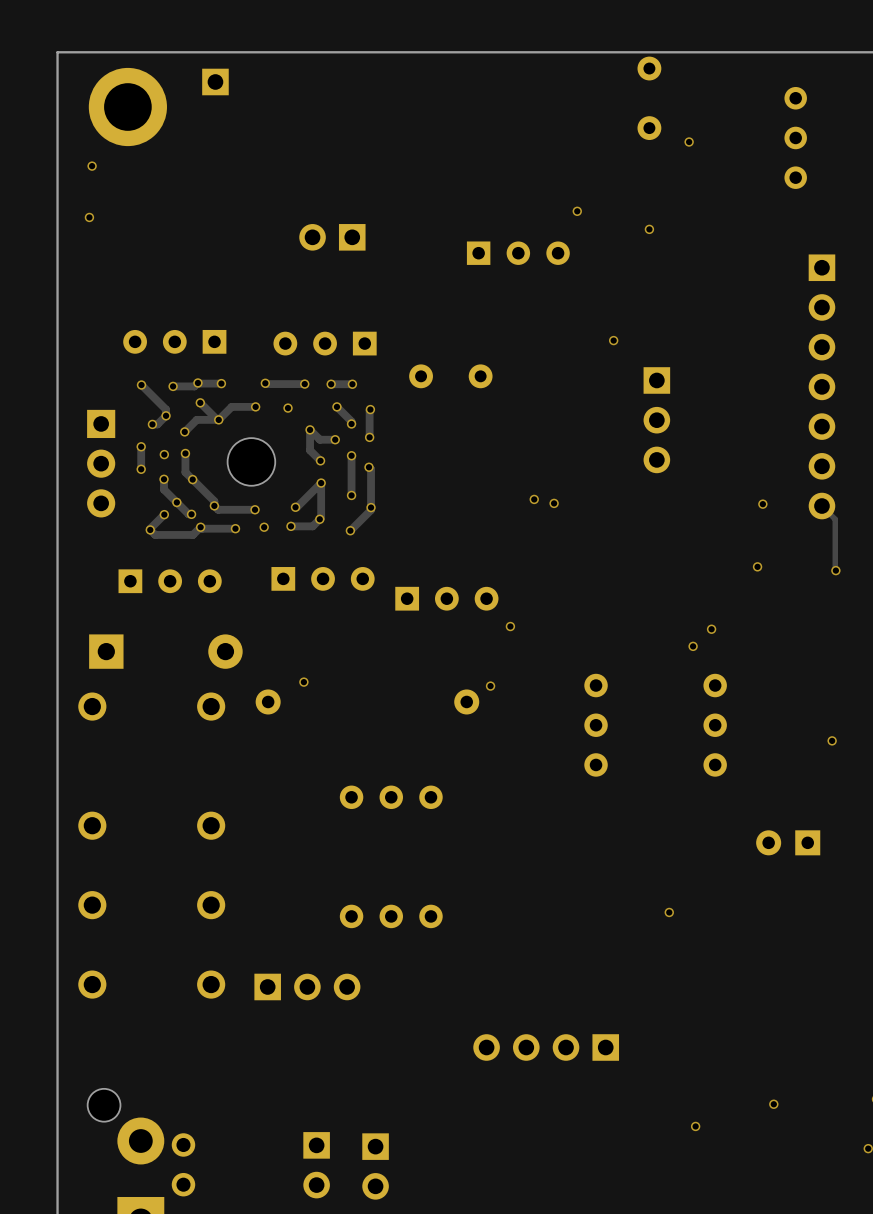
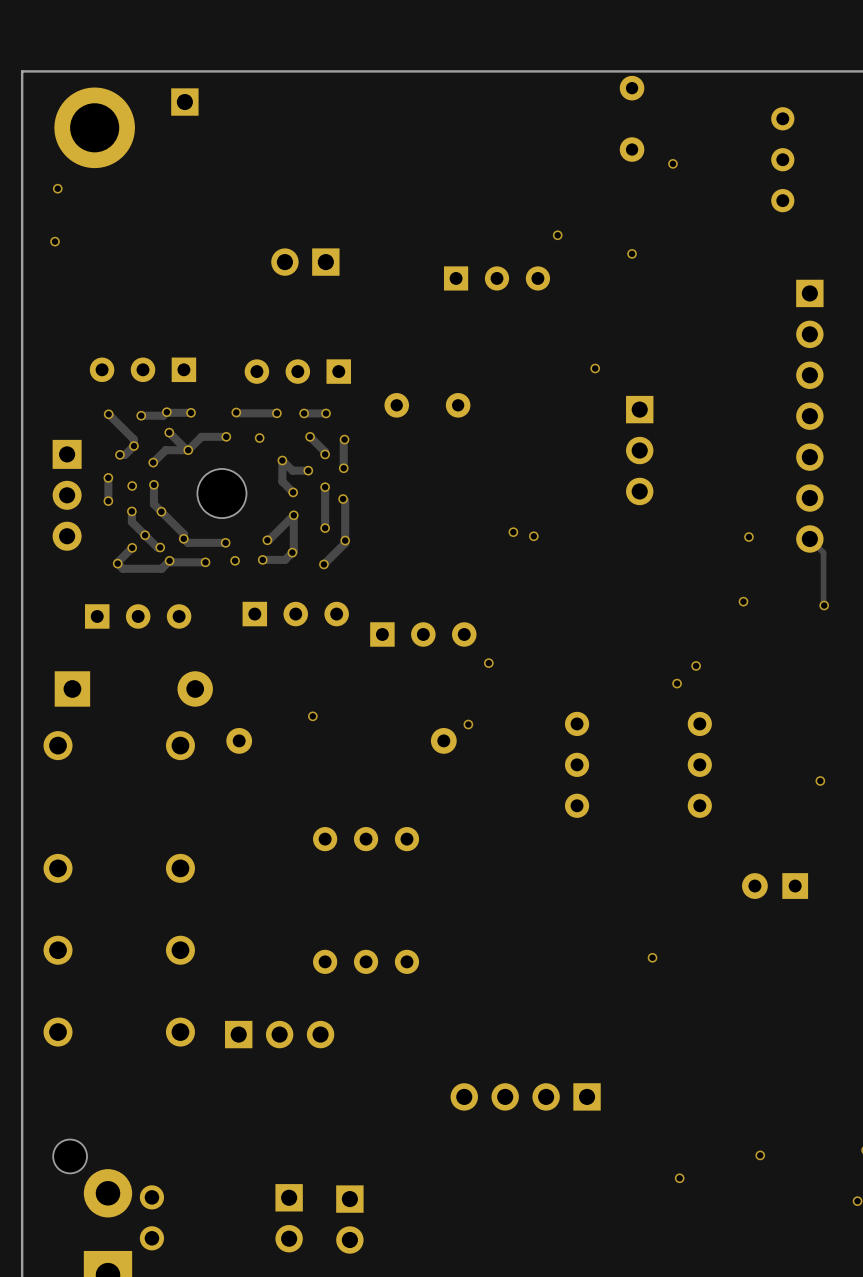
via position: (303, 682) -> (312, 716)

